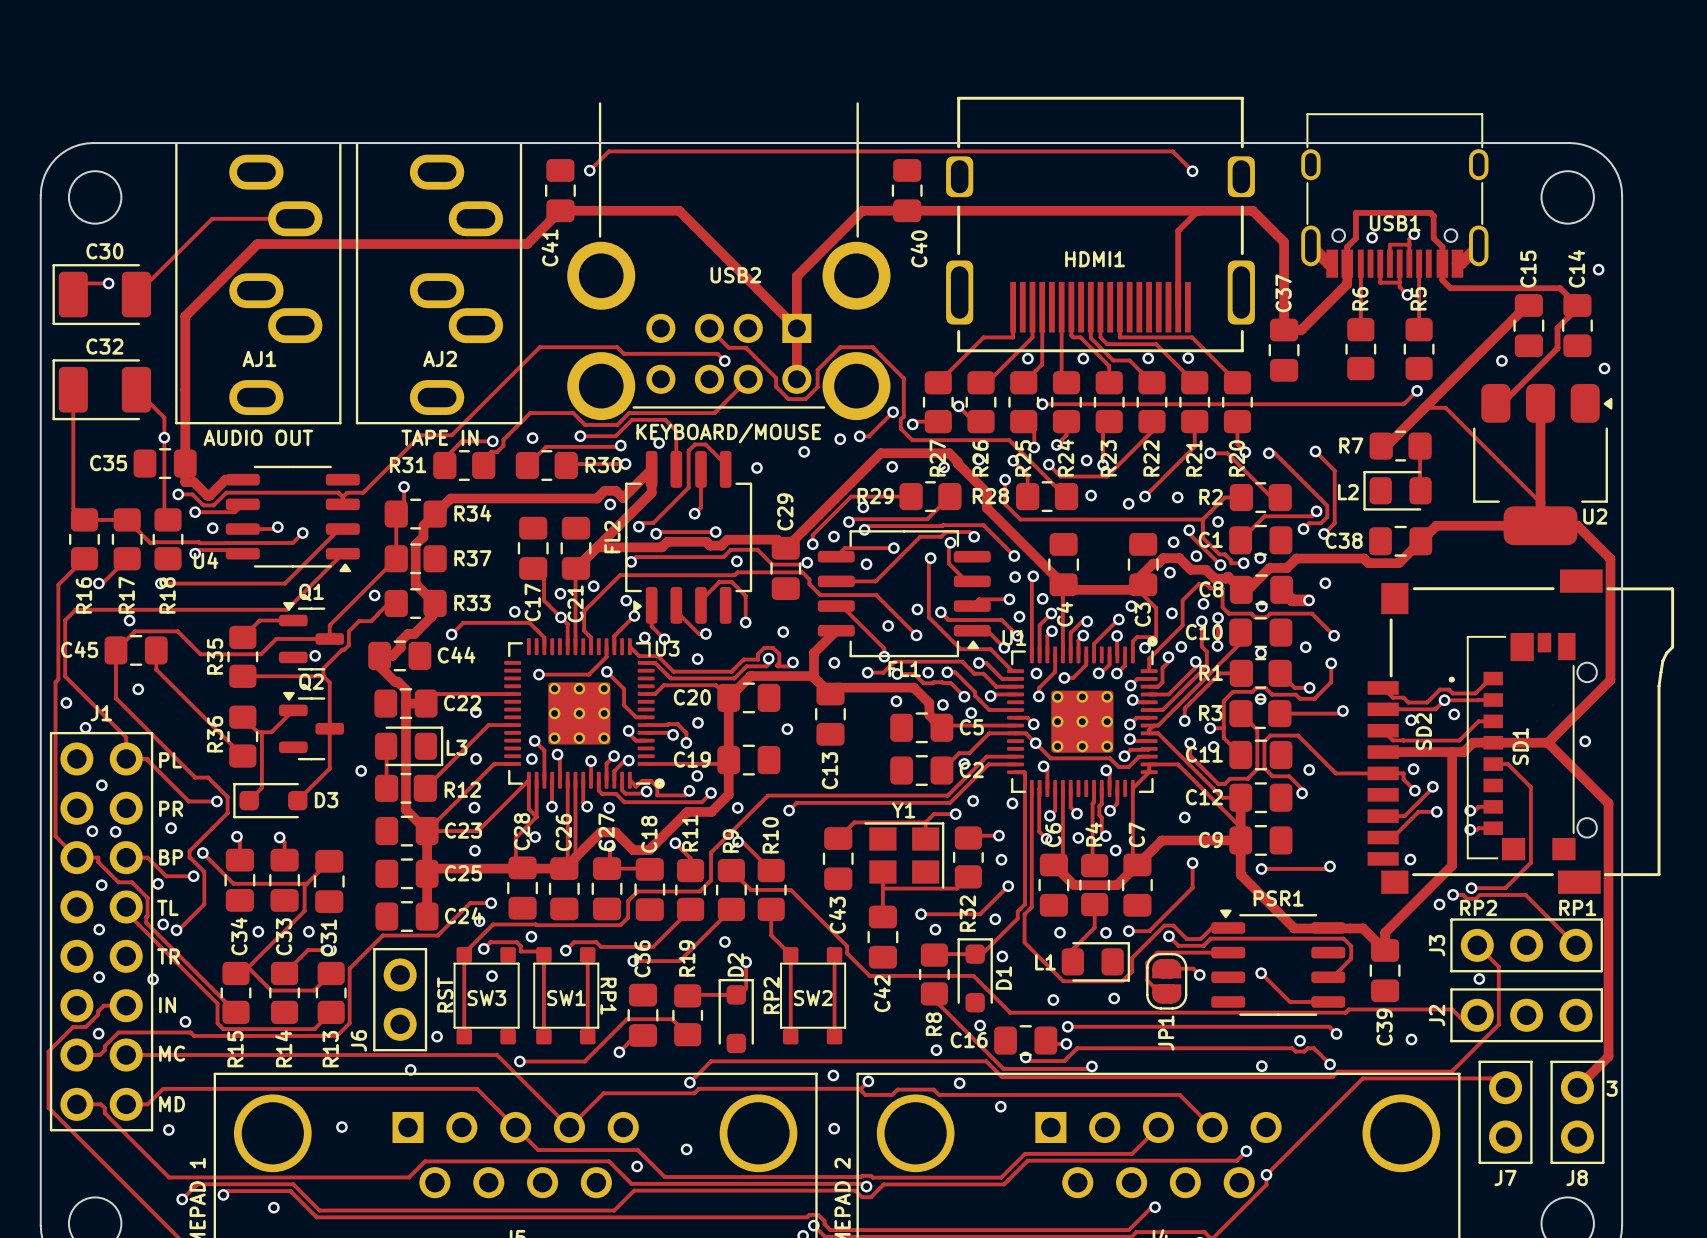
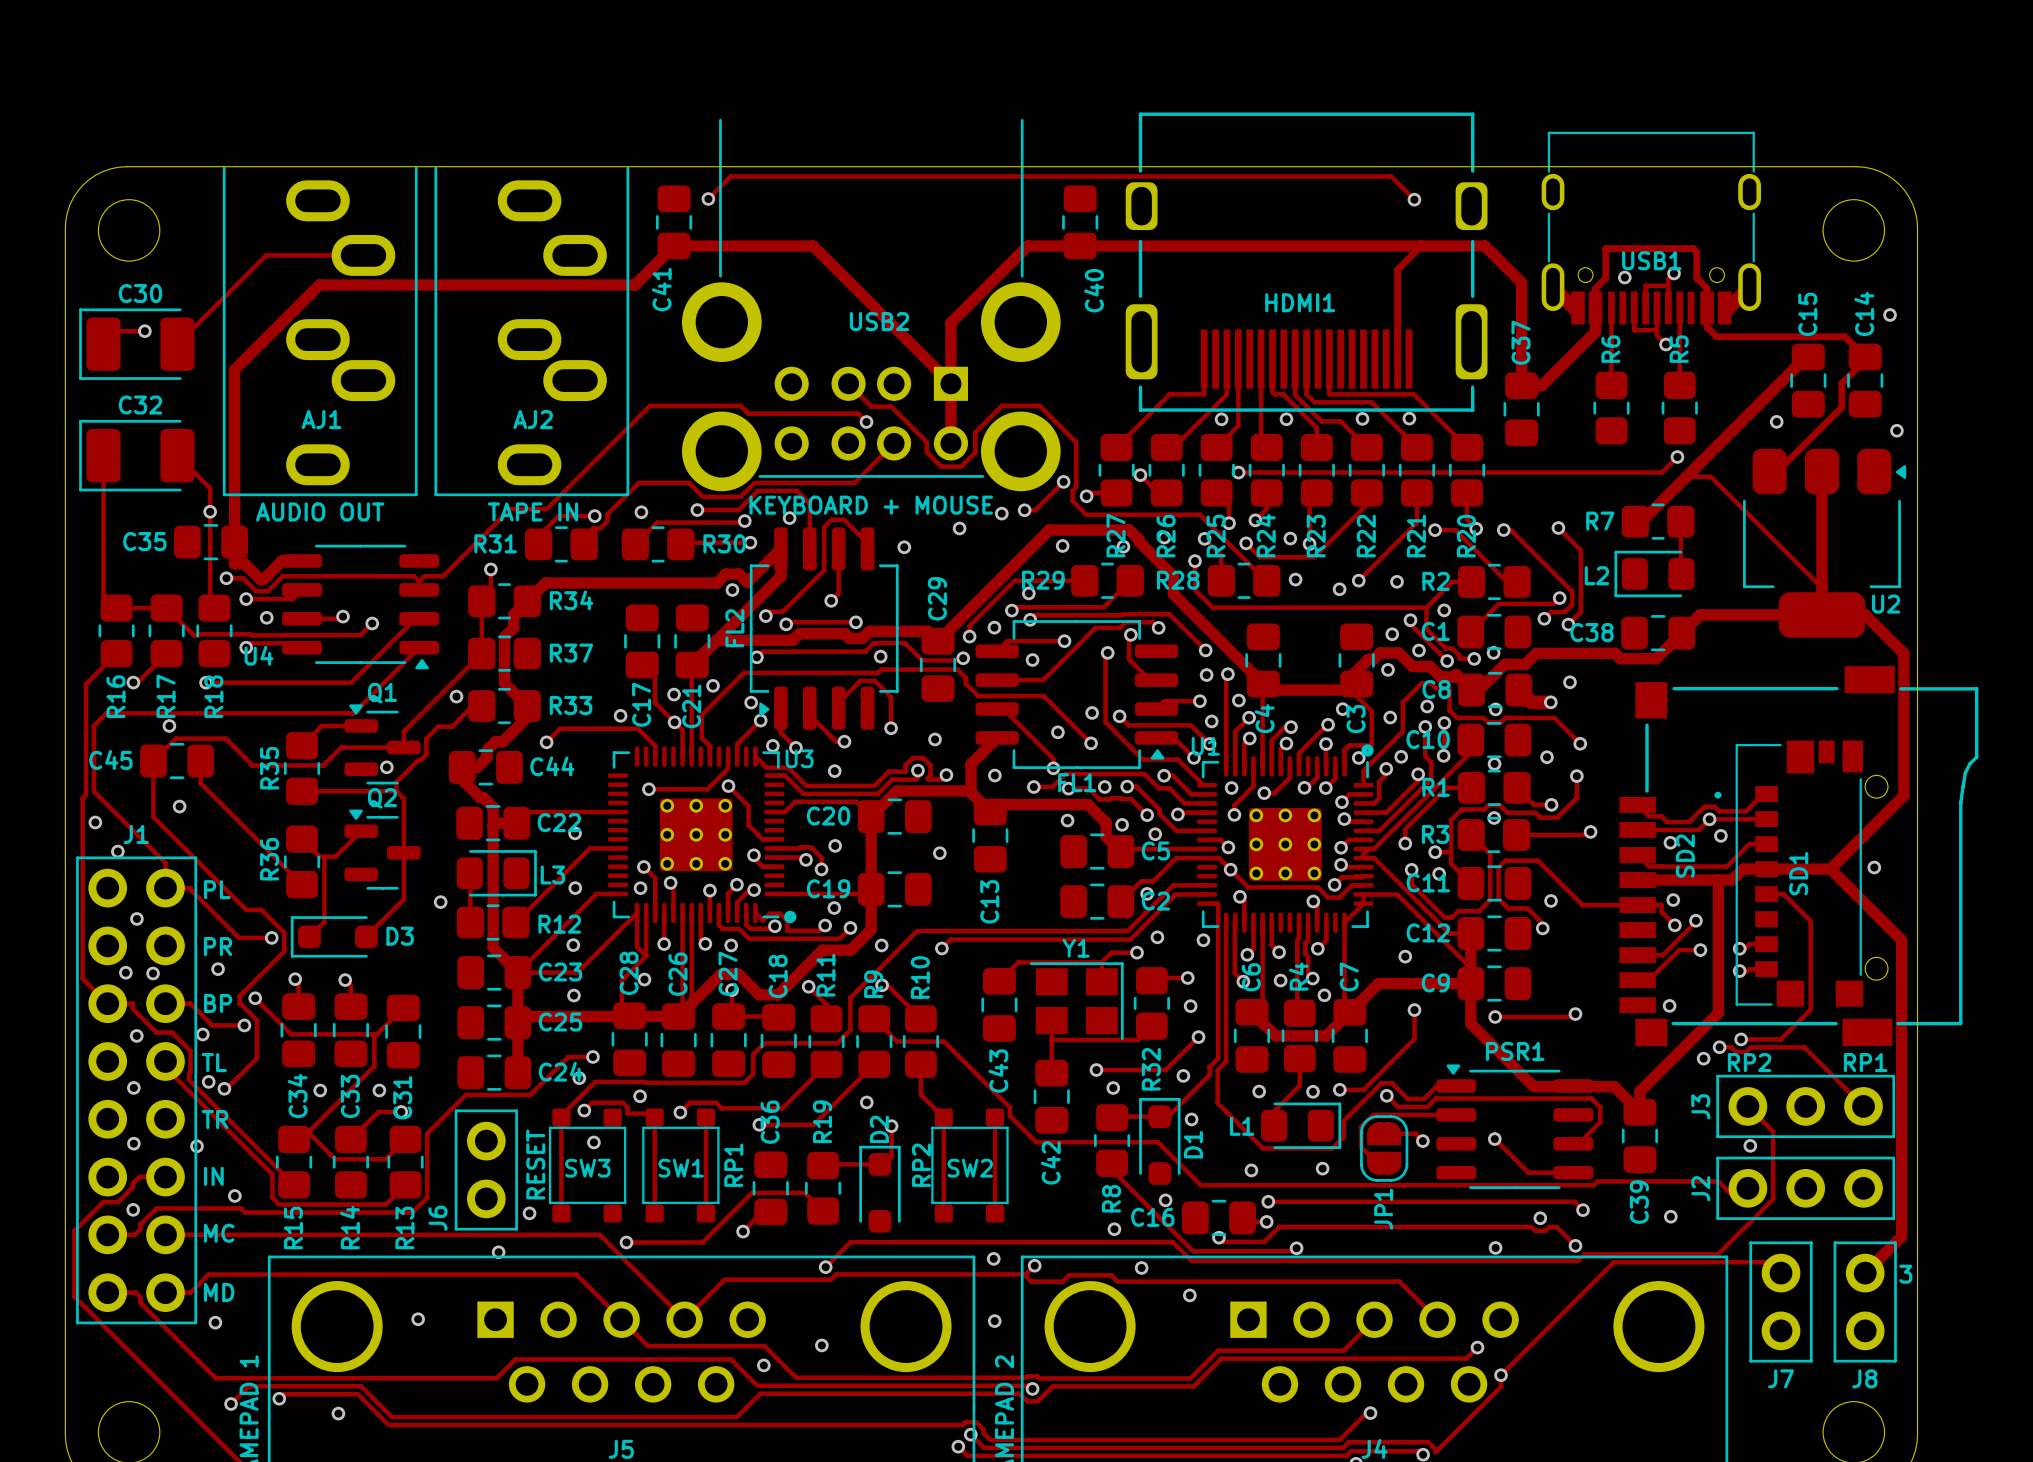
text: KEYBOARD/MOUSE (728, 433) -> KEYBOARD + MOUSE (871, 505)
text: RST (445, 994) -> RESET (535, 1164)
text rotation: 0° (608, 996) -> 180° (733, 1165)

